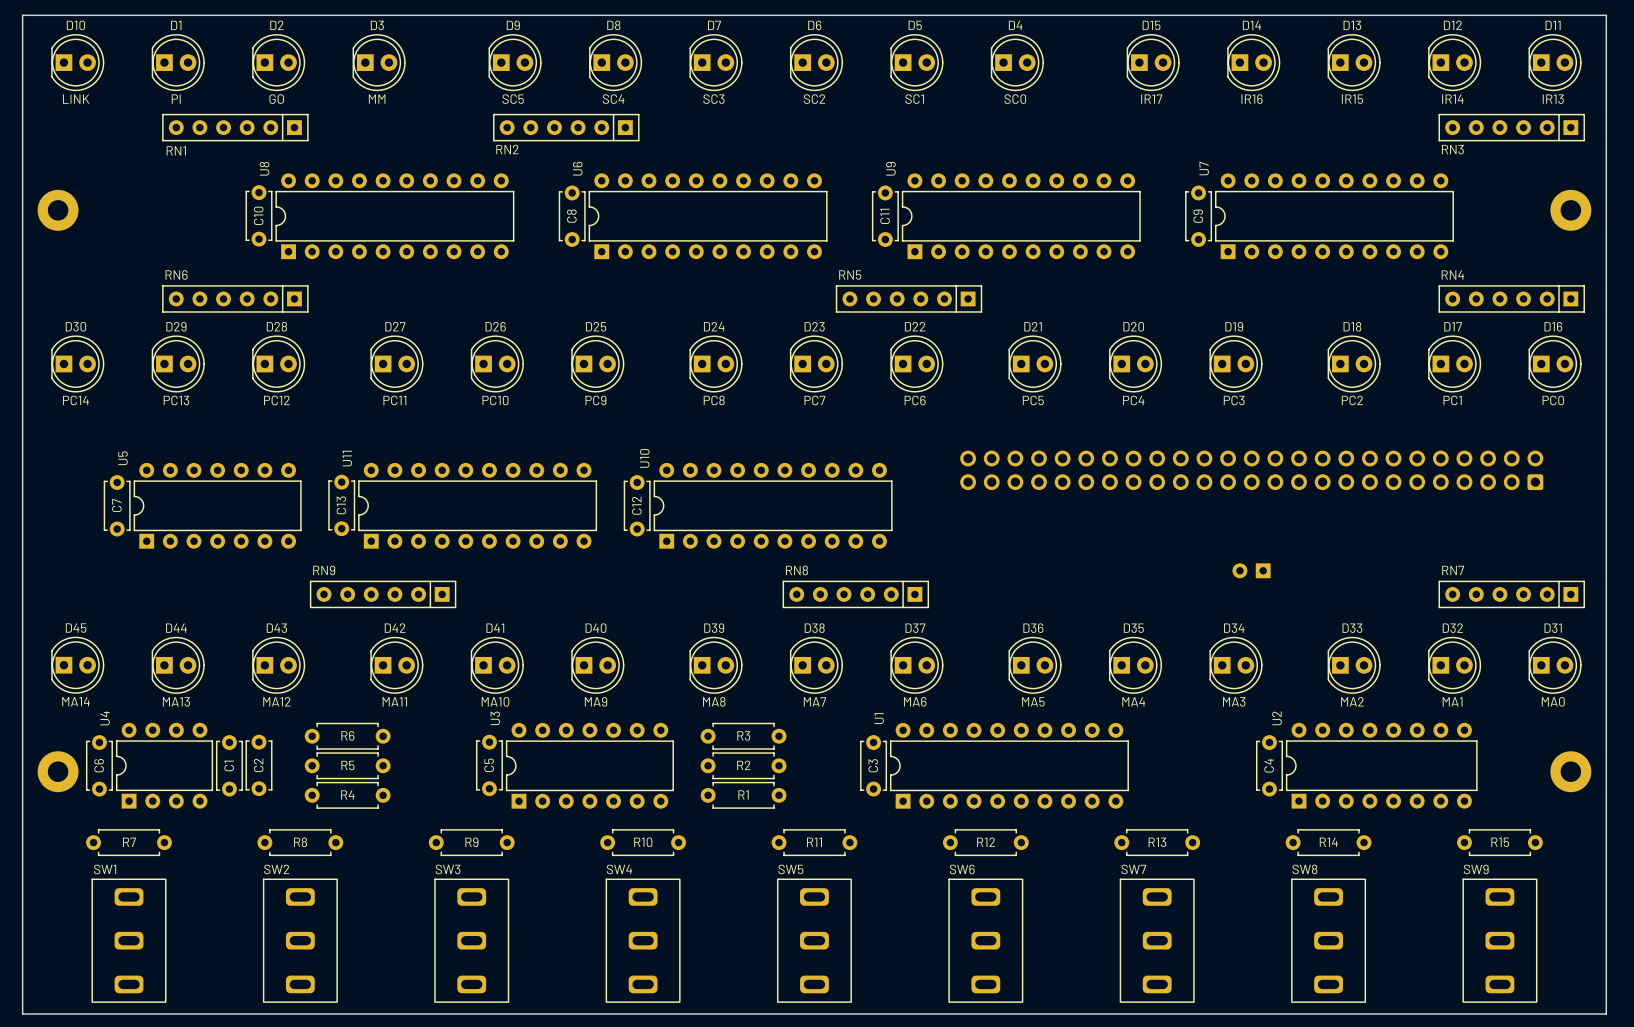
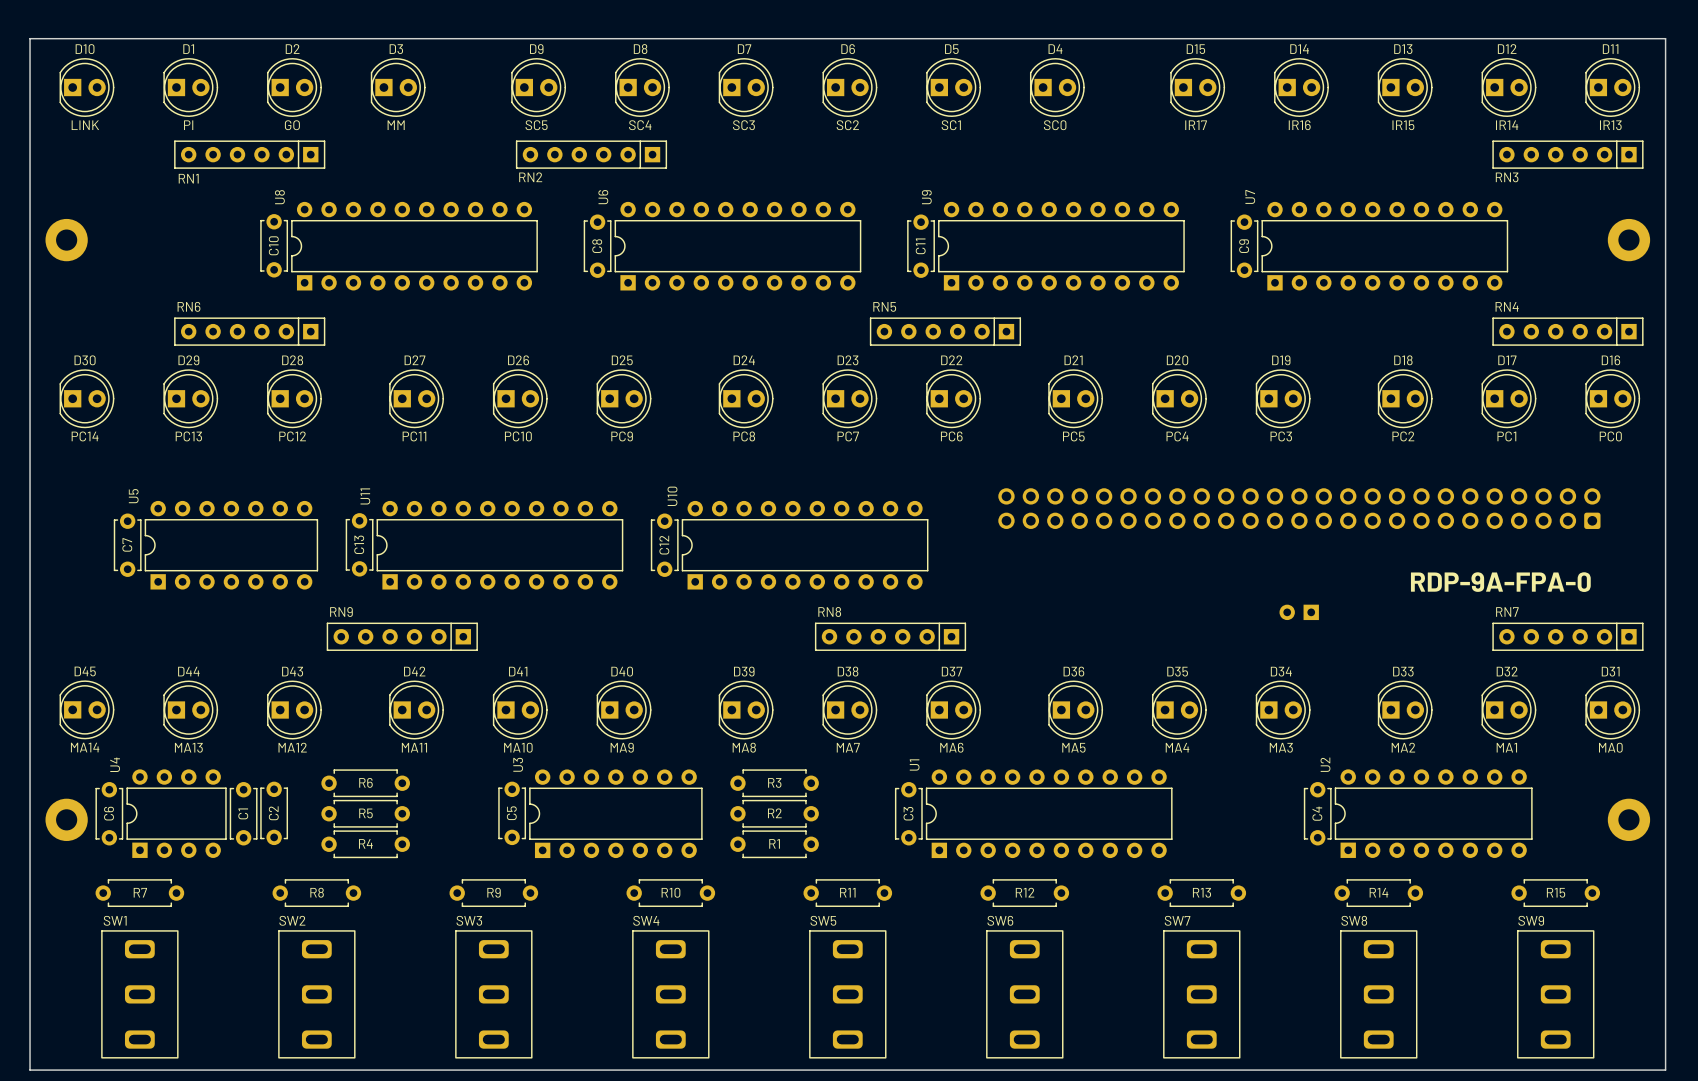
text: none -> RDP-9A-FPA-0 (1500, 582)

